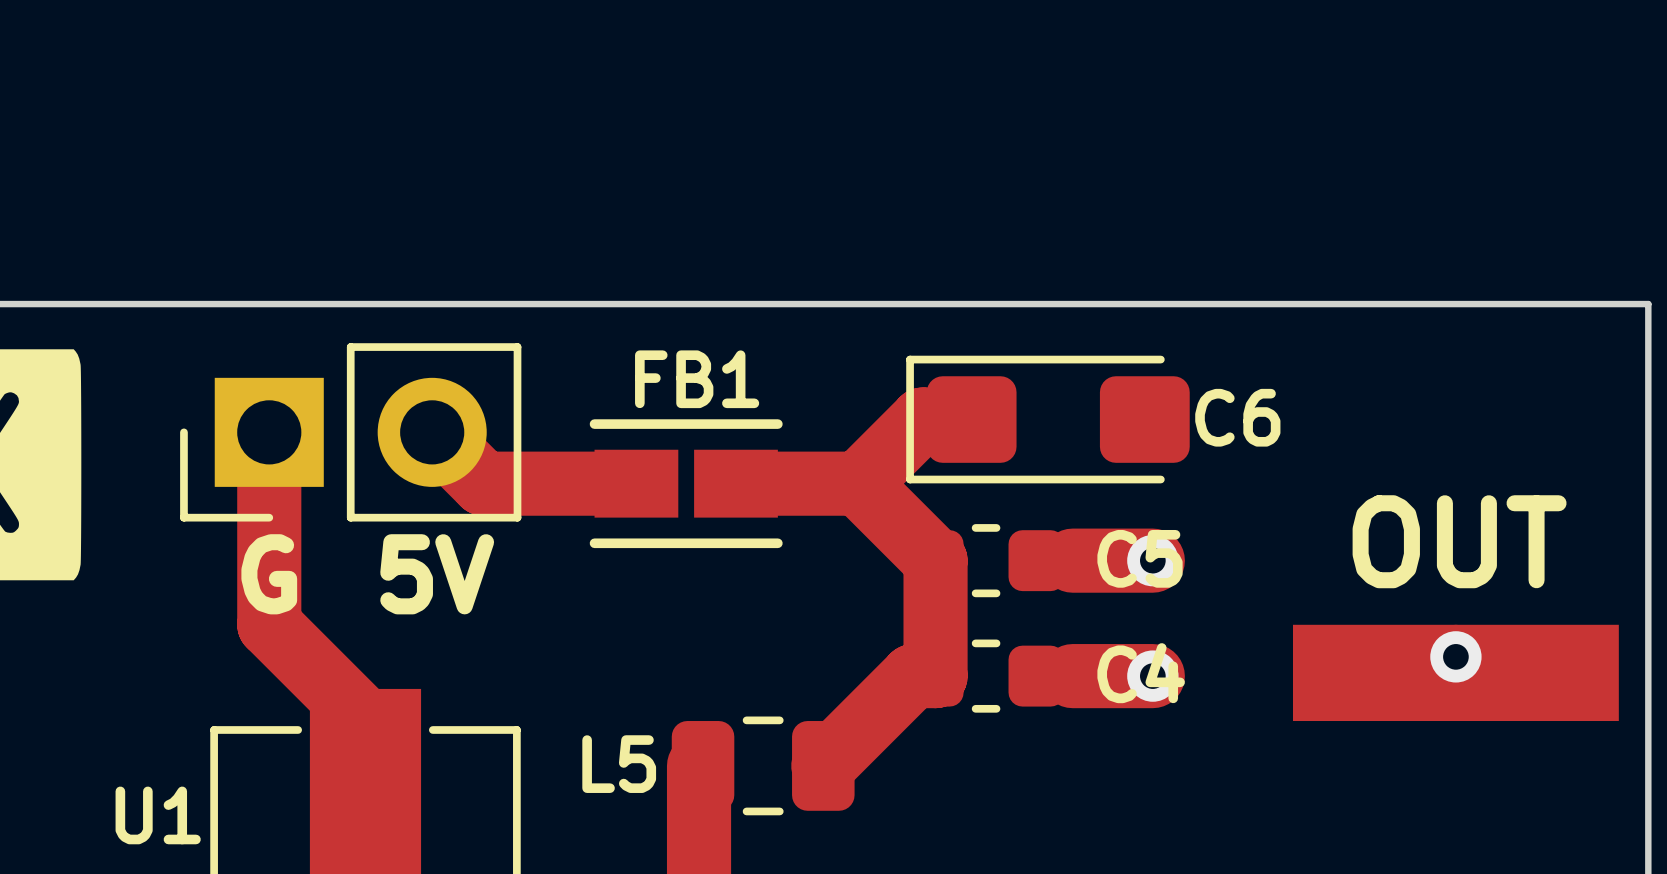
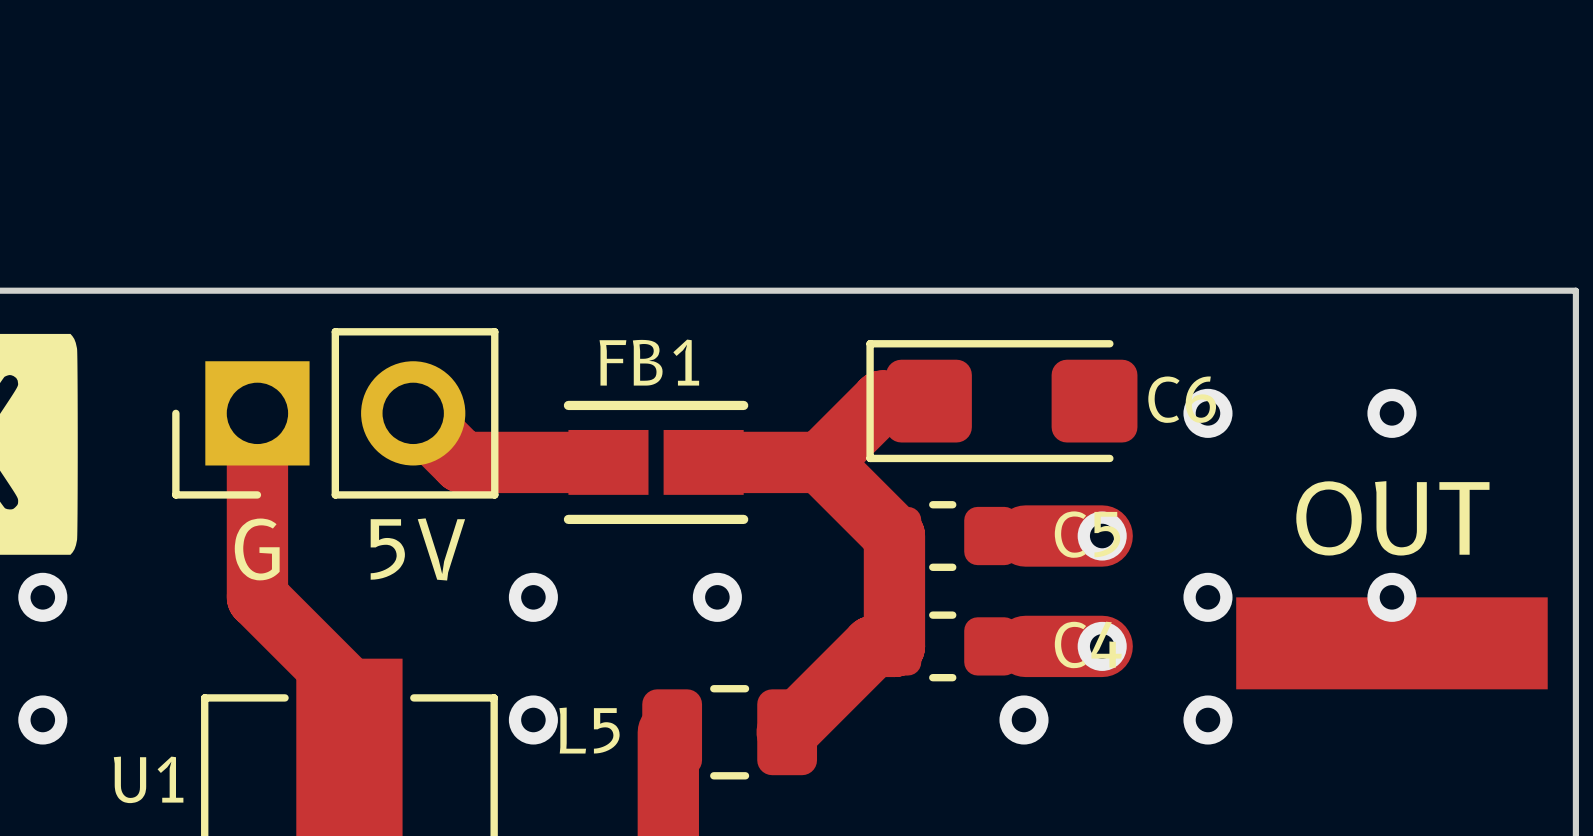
via: none -> (1207, 413)
via: none -> (1391, 413)
via: none -> (42, 597)
via: none -> (533, 597)
via: none -> (717, 597)
via: none -> (1207, 597)
via position: (1455, 656) -> (1391, 597)
via: none -> (42, 719)
via: none -> (533, 719)
via: none -> (1024, 719)
via: none -> (1207, 719)

